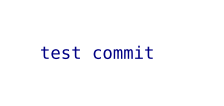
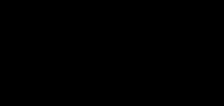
text: test commit (96, 52) -> none

